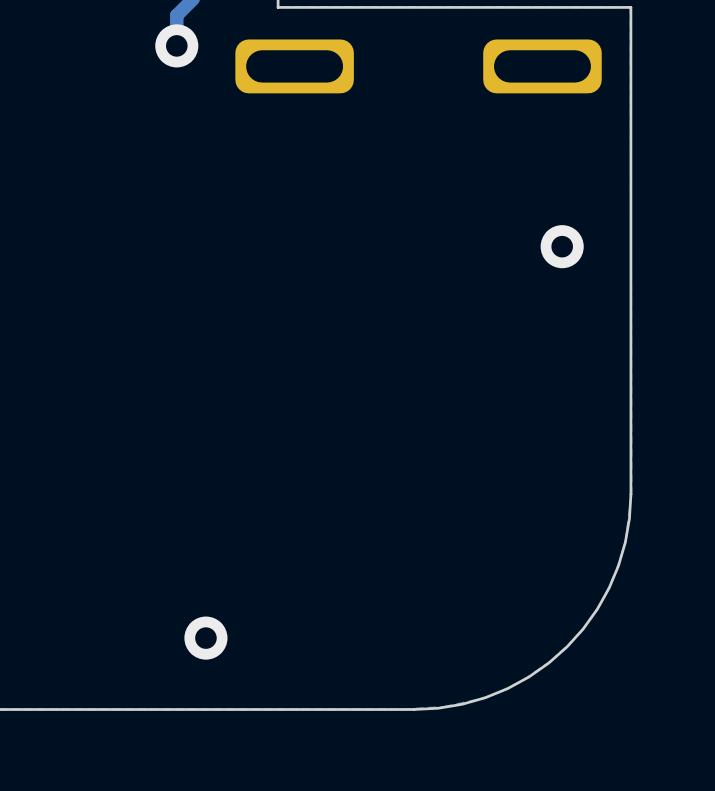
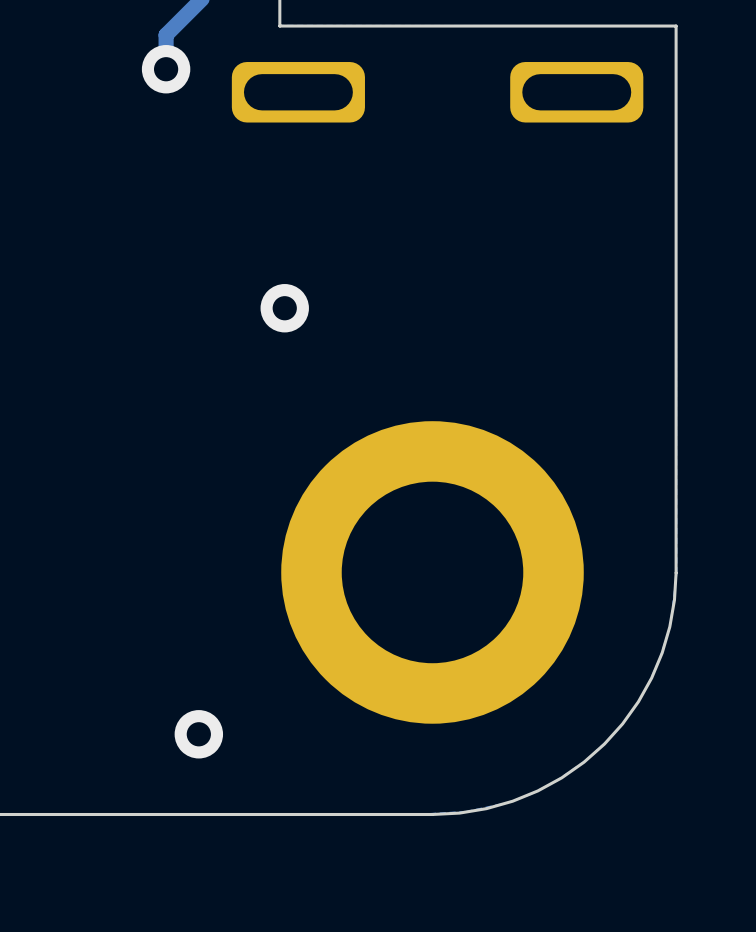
via position: (562, 246) -> (284, 308)
part: none -> (432, 572)

